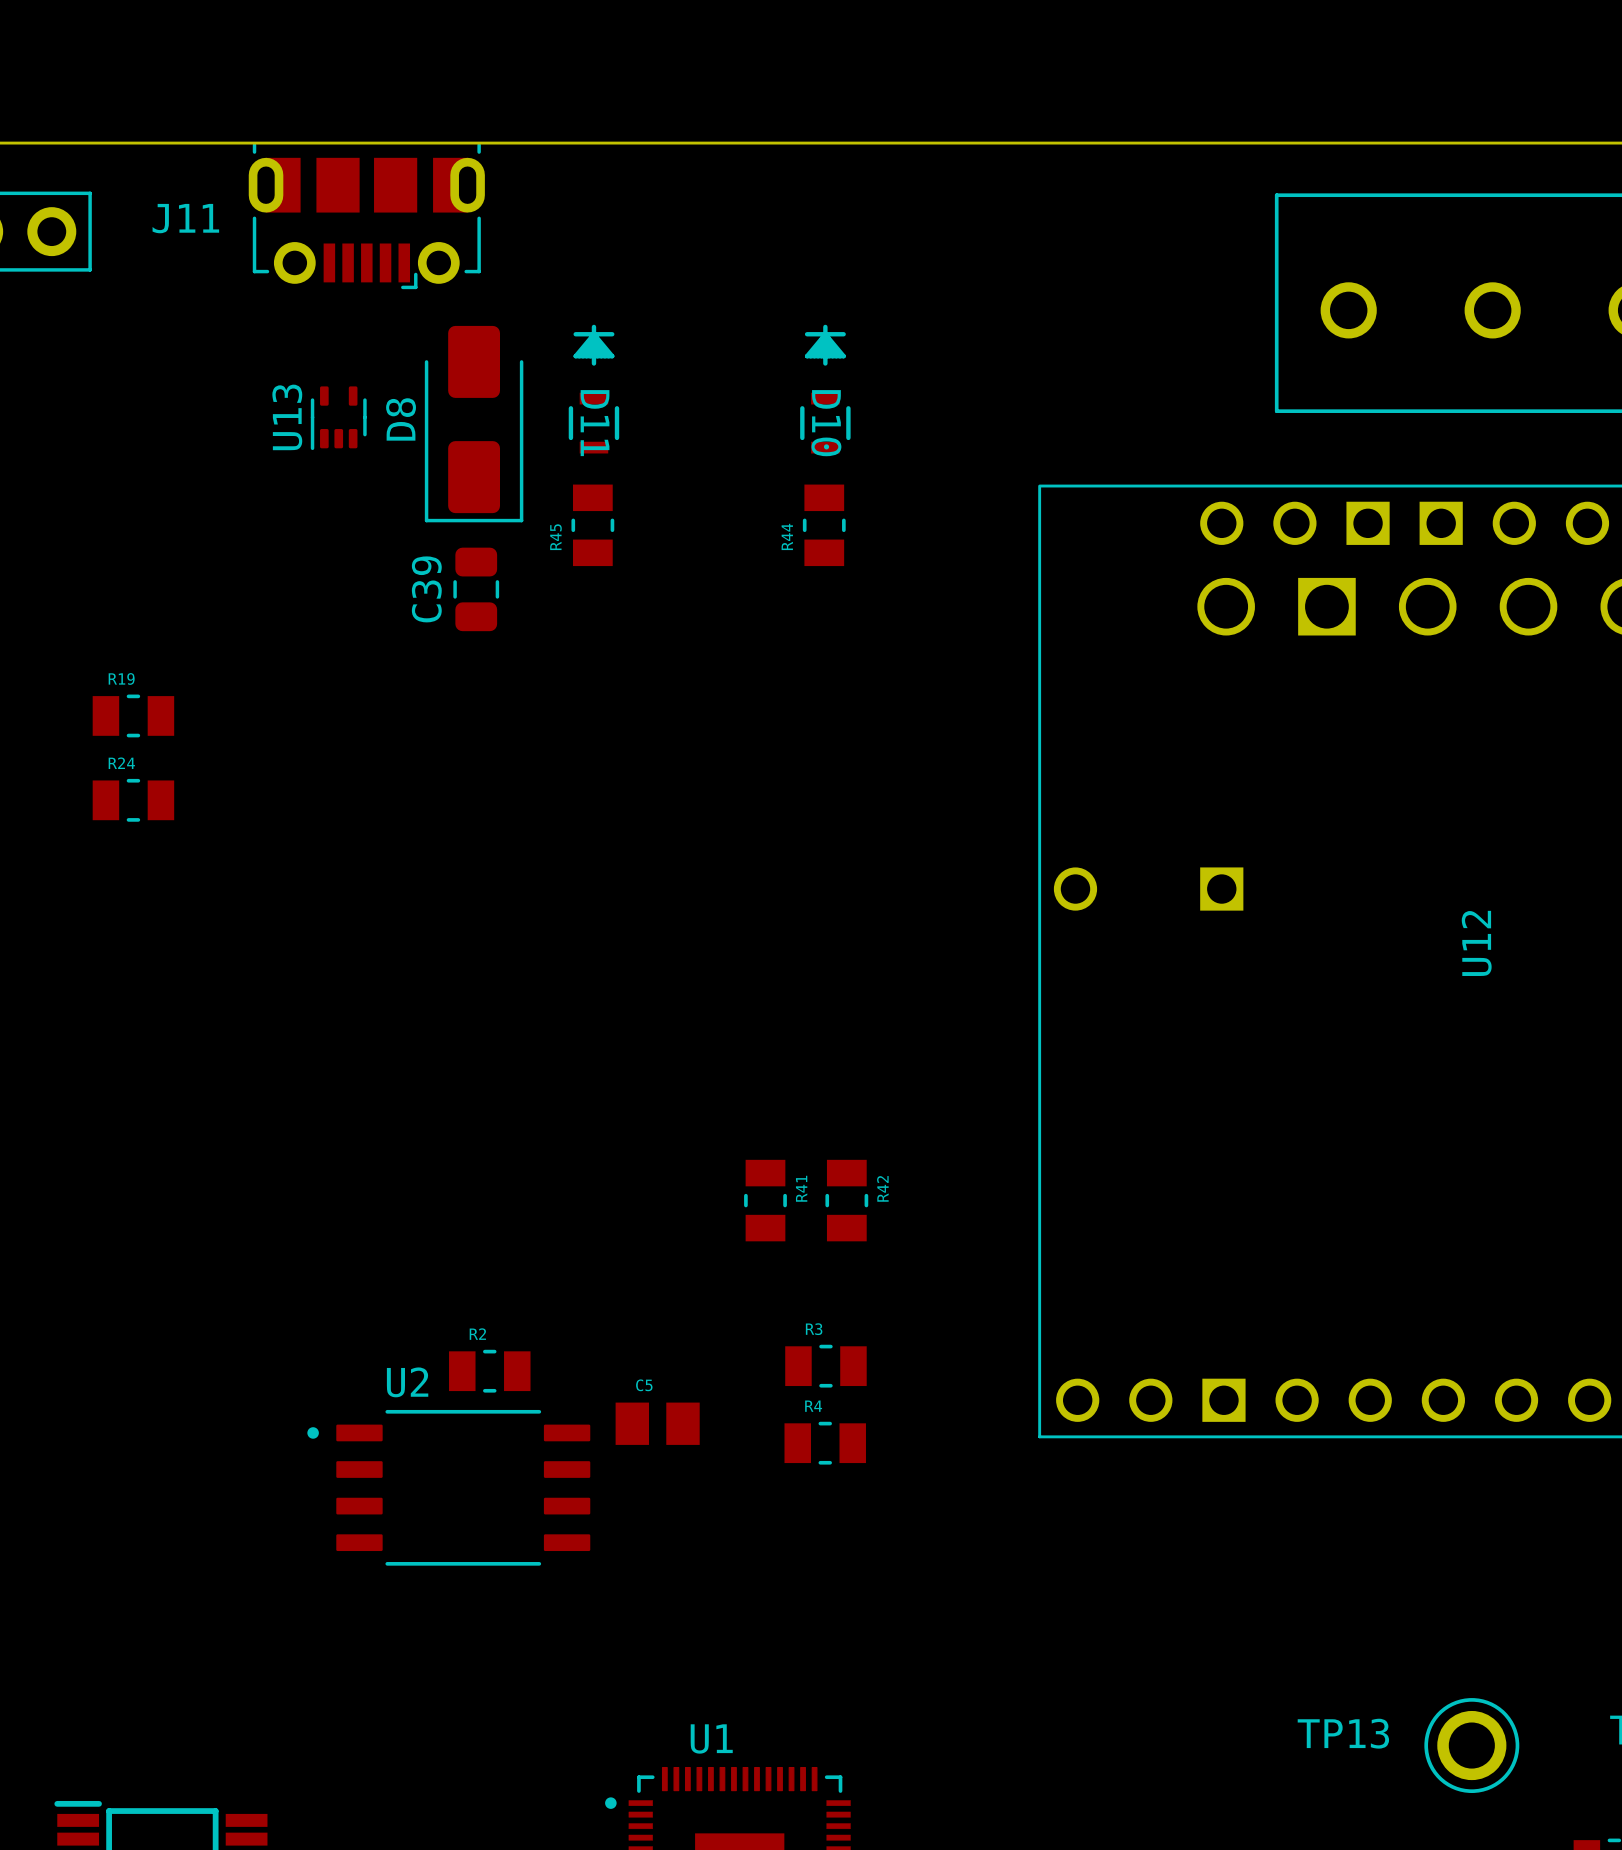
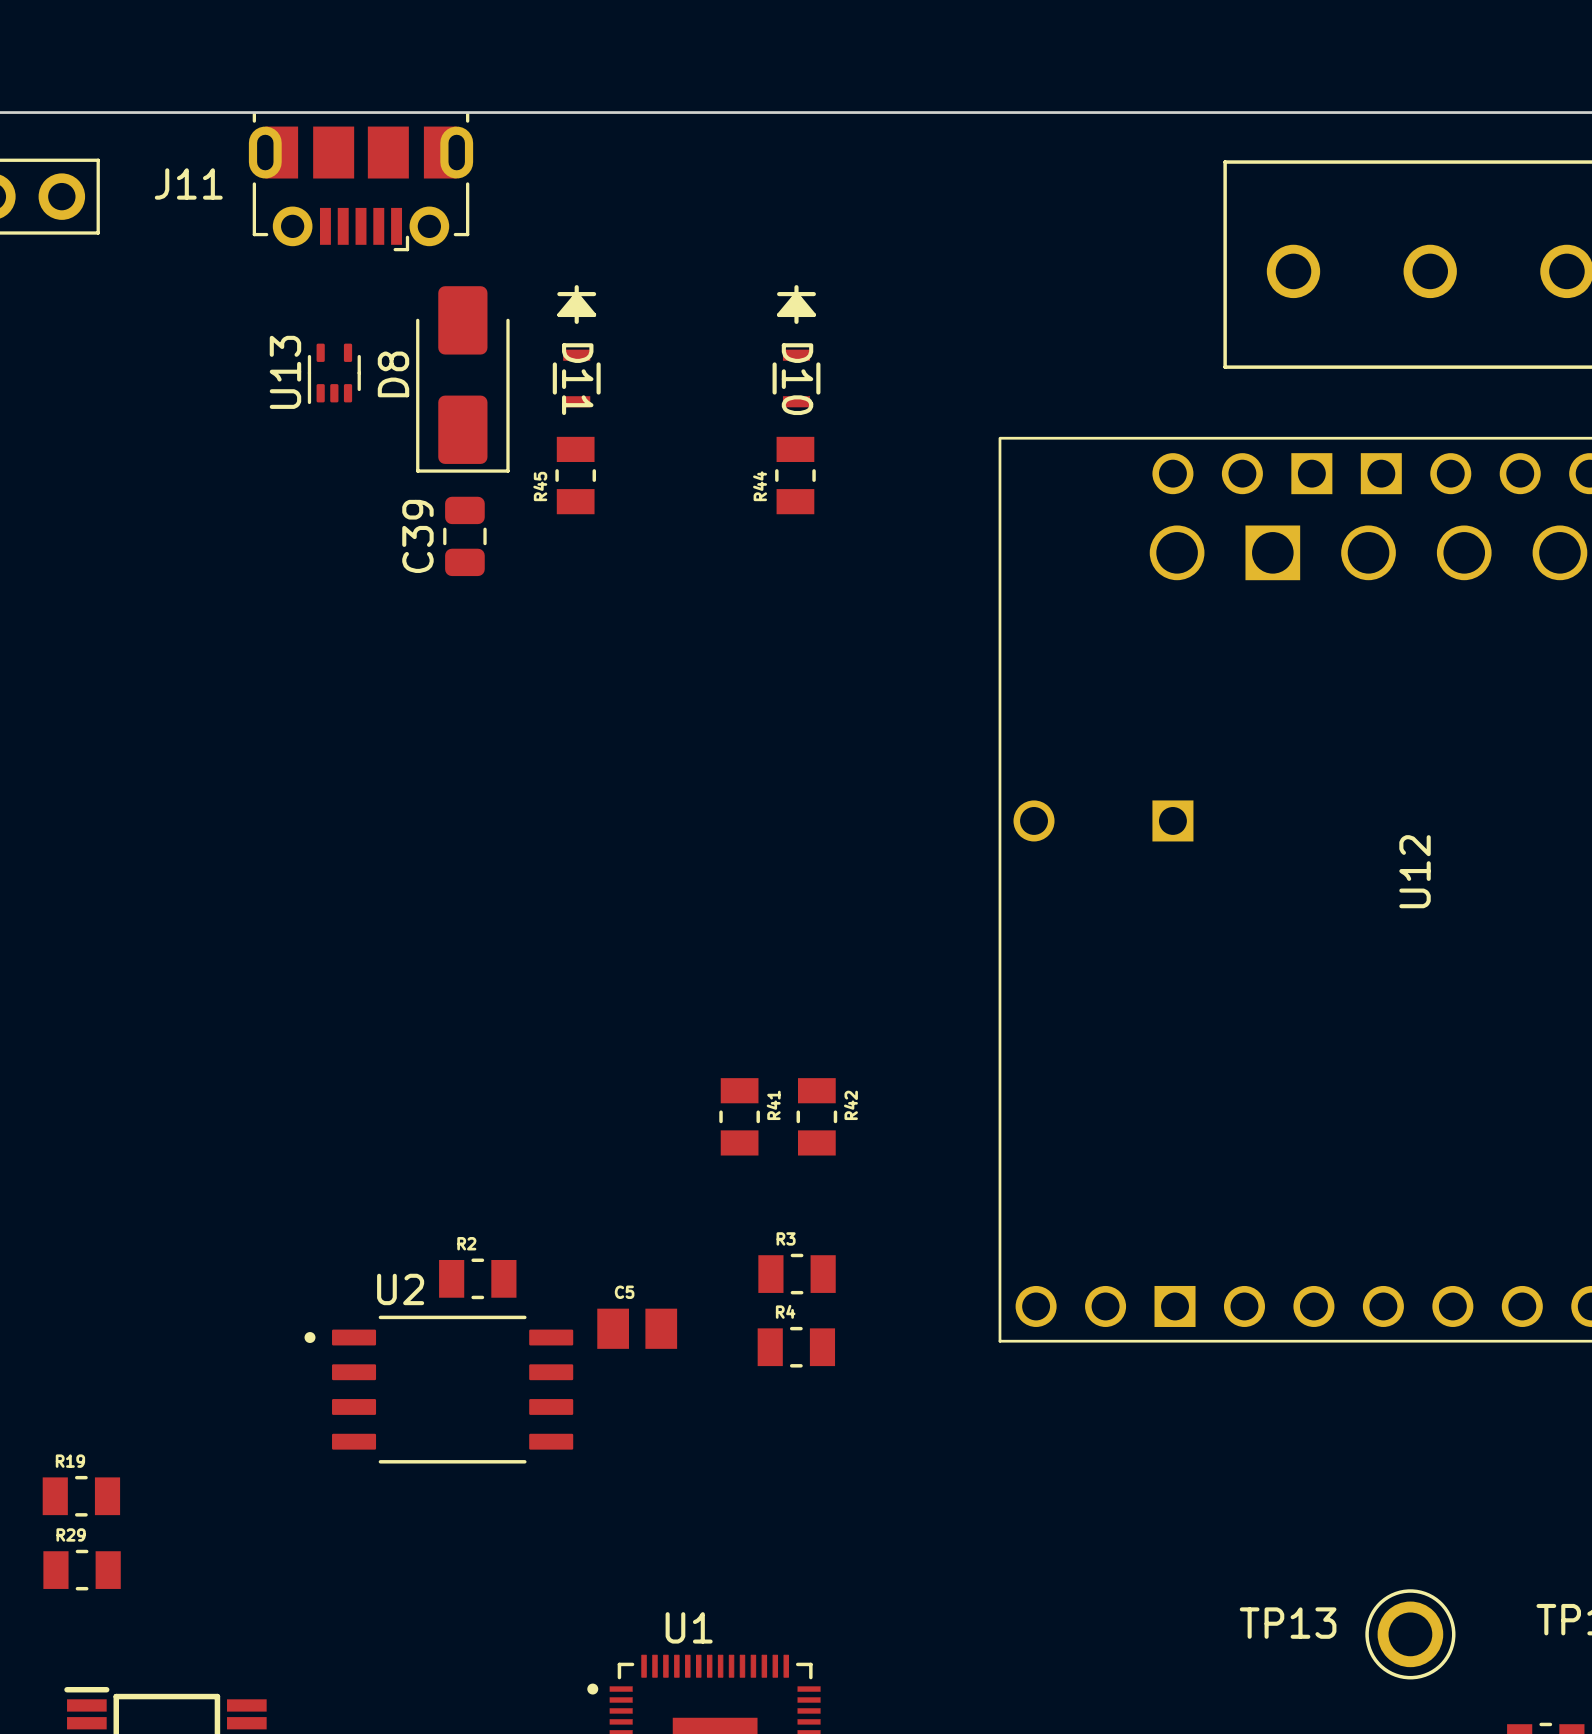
R19 position: (133, 715) -> (81, 1496)
R24: (133, 800) -> none
R29: none -> (82, 1570)

